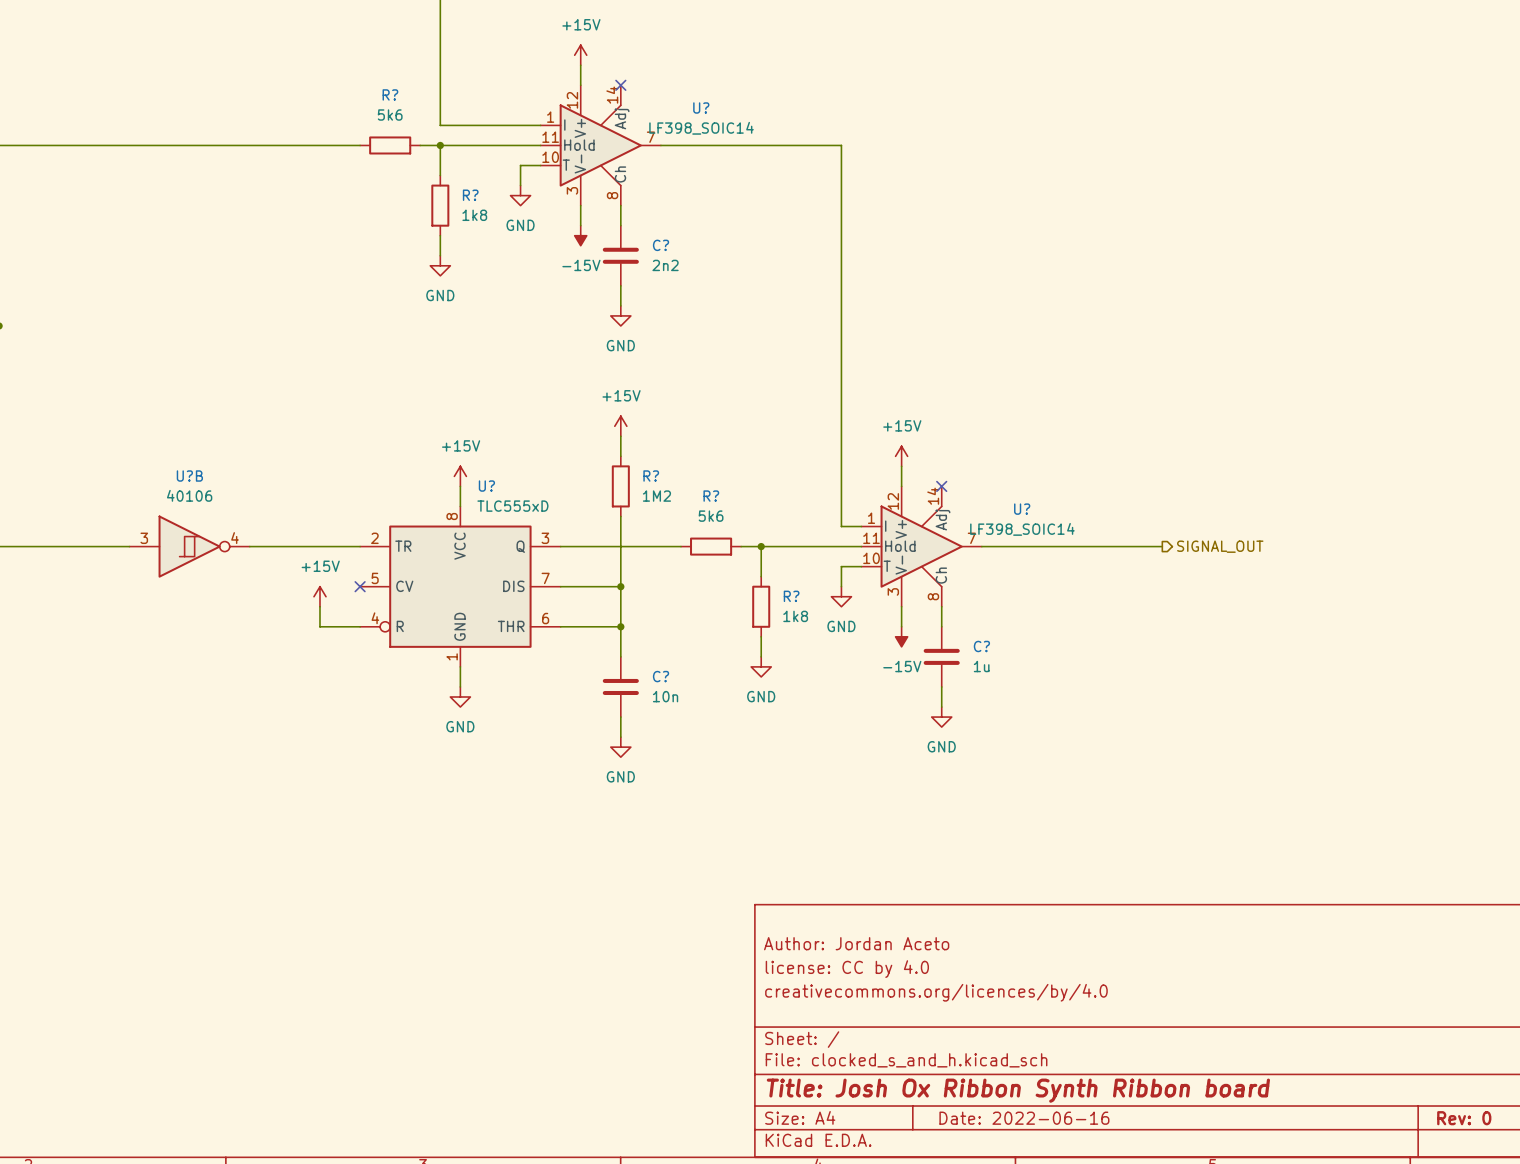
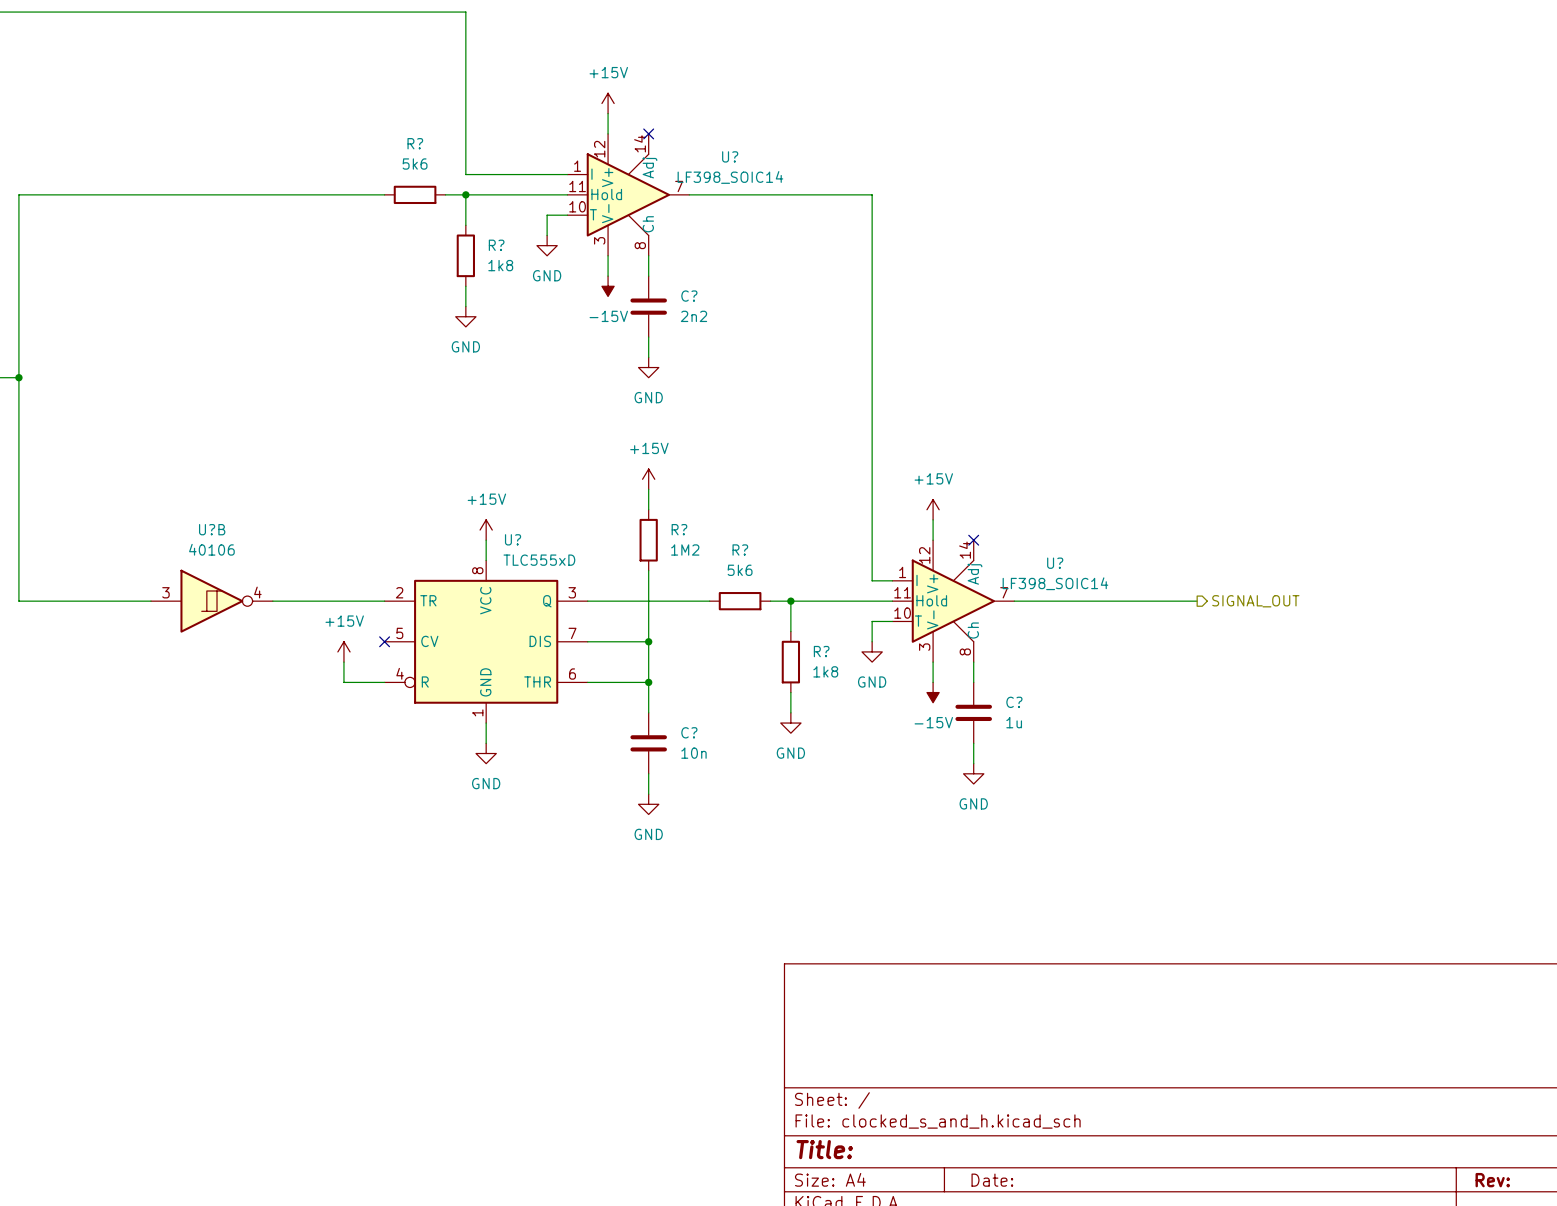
title block: Author: Jordan Aceto (856, 943) -> none
title block: license: CC by 4.0 (847, 969) -> none
title block: creativecommons.org/licences/by/4.0 (936, 992) -> none
title block: Title: Josh Ox Ribbon Synth Ribbon board (1018, 1090) -> Title: (824, 1149)
title block: Date: 2022-06-16 (1024, 1118) -> Date: (992, 1180)
title block: Rev: 0 (1464, 1118) -> Rev: (1492, 1180)

